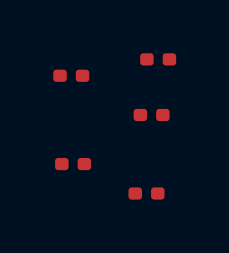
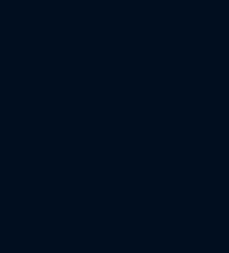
part: (158, 59) -> none
part: (71, 75) -> none
part: (151, 114) -> none
part: (73, 164) -> none
part: (146, 193) -> none

